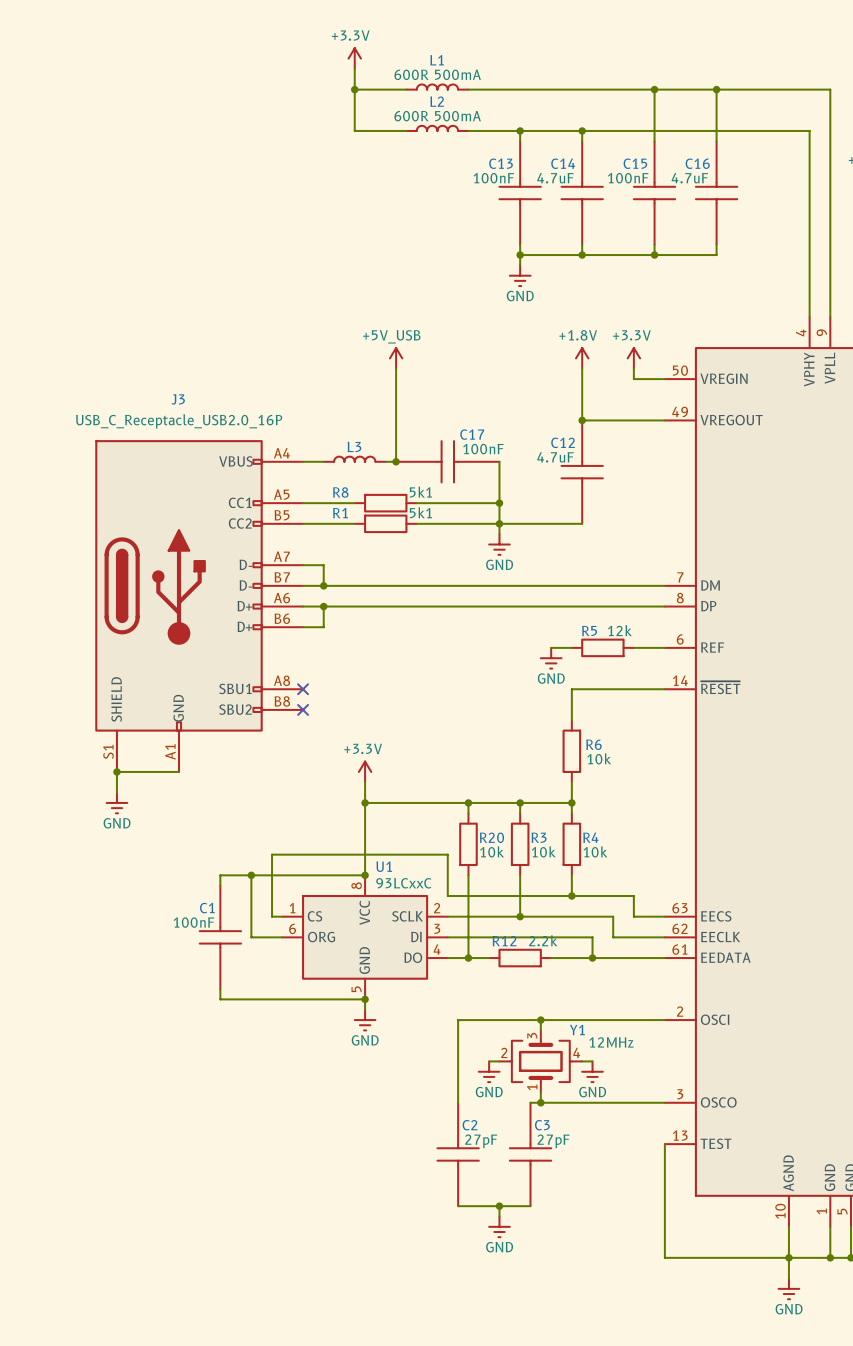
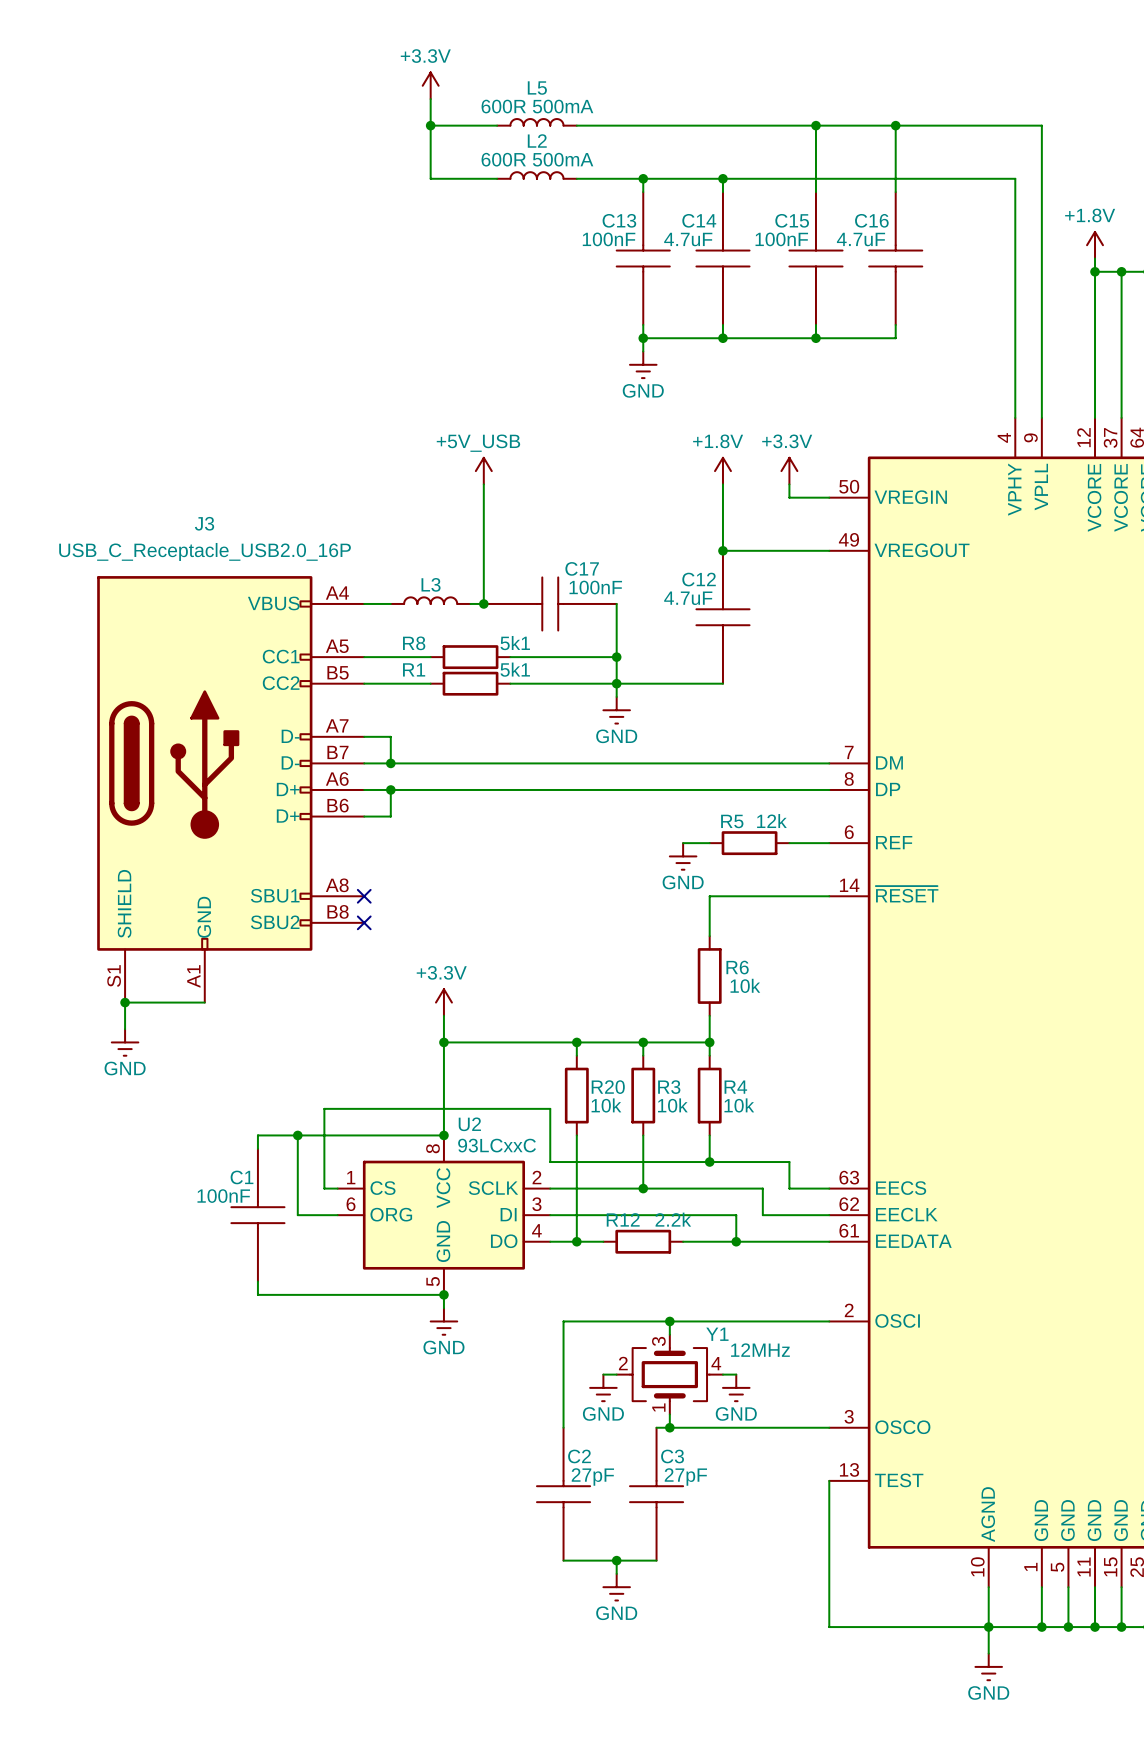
L1 name: L1 (437, 60) -> L5 (537, 88)
U1 name: U1 (384, 866) -> U2 (469, 1124)

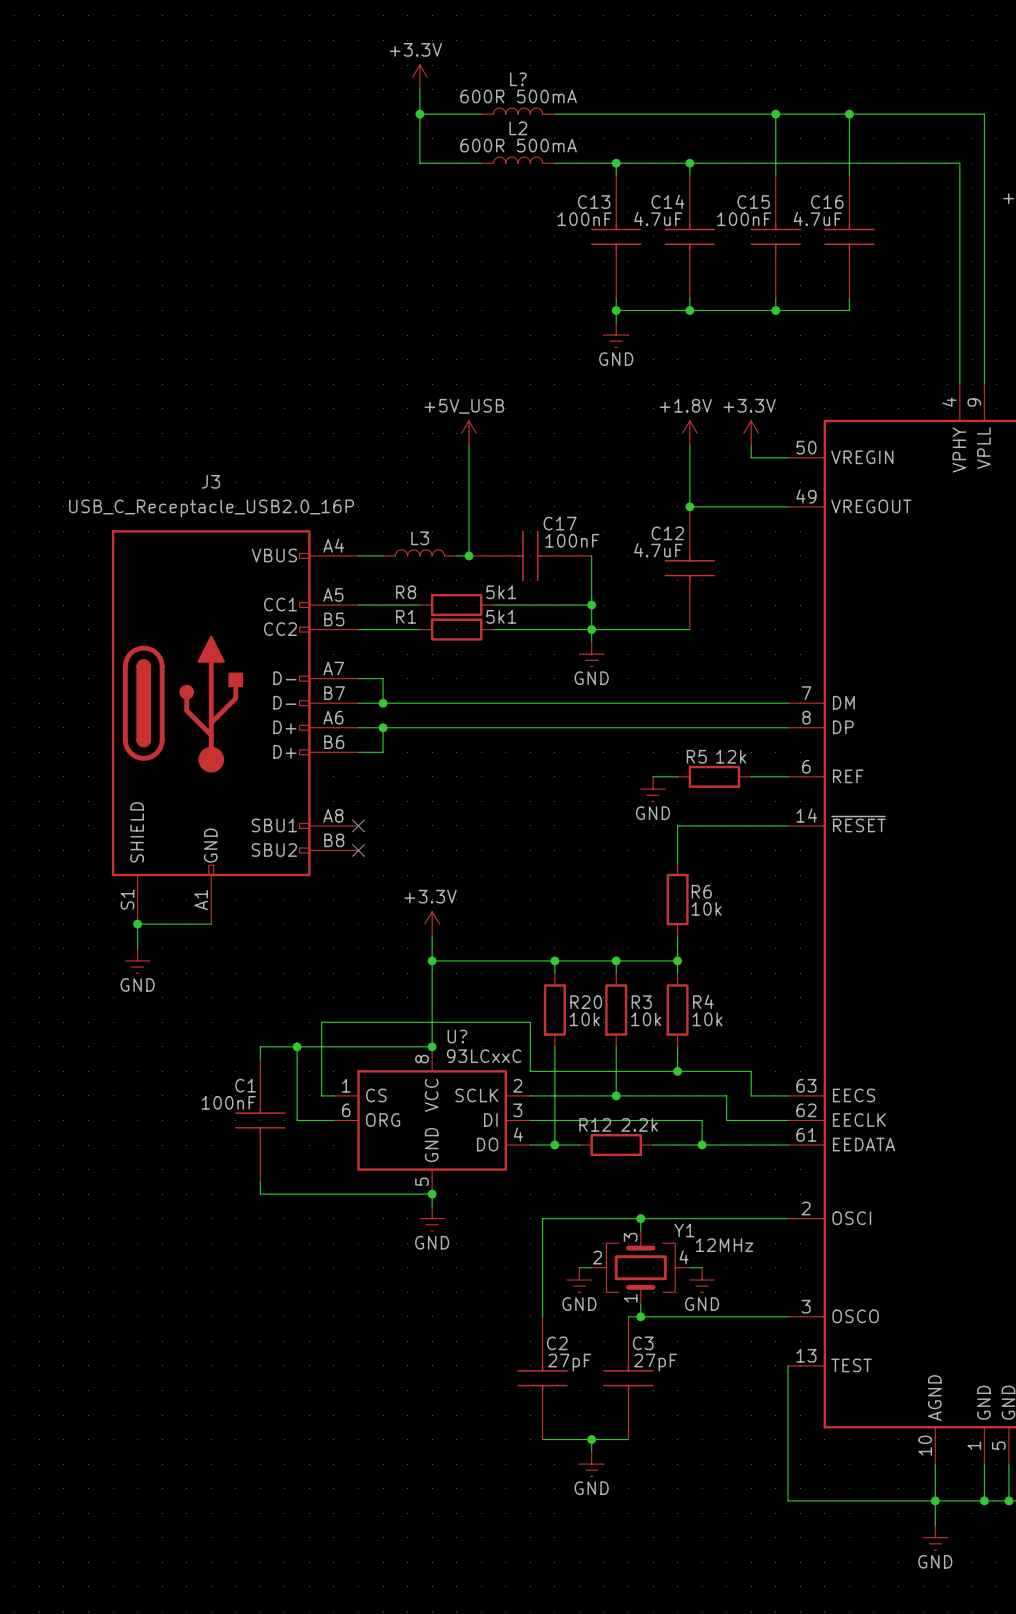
L5 name: L5 (537, 88) -> L? (518, 79)
U2 name: U2 (469, 1124) -> U? (457, 1036)

